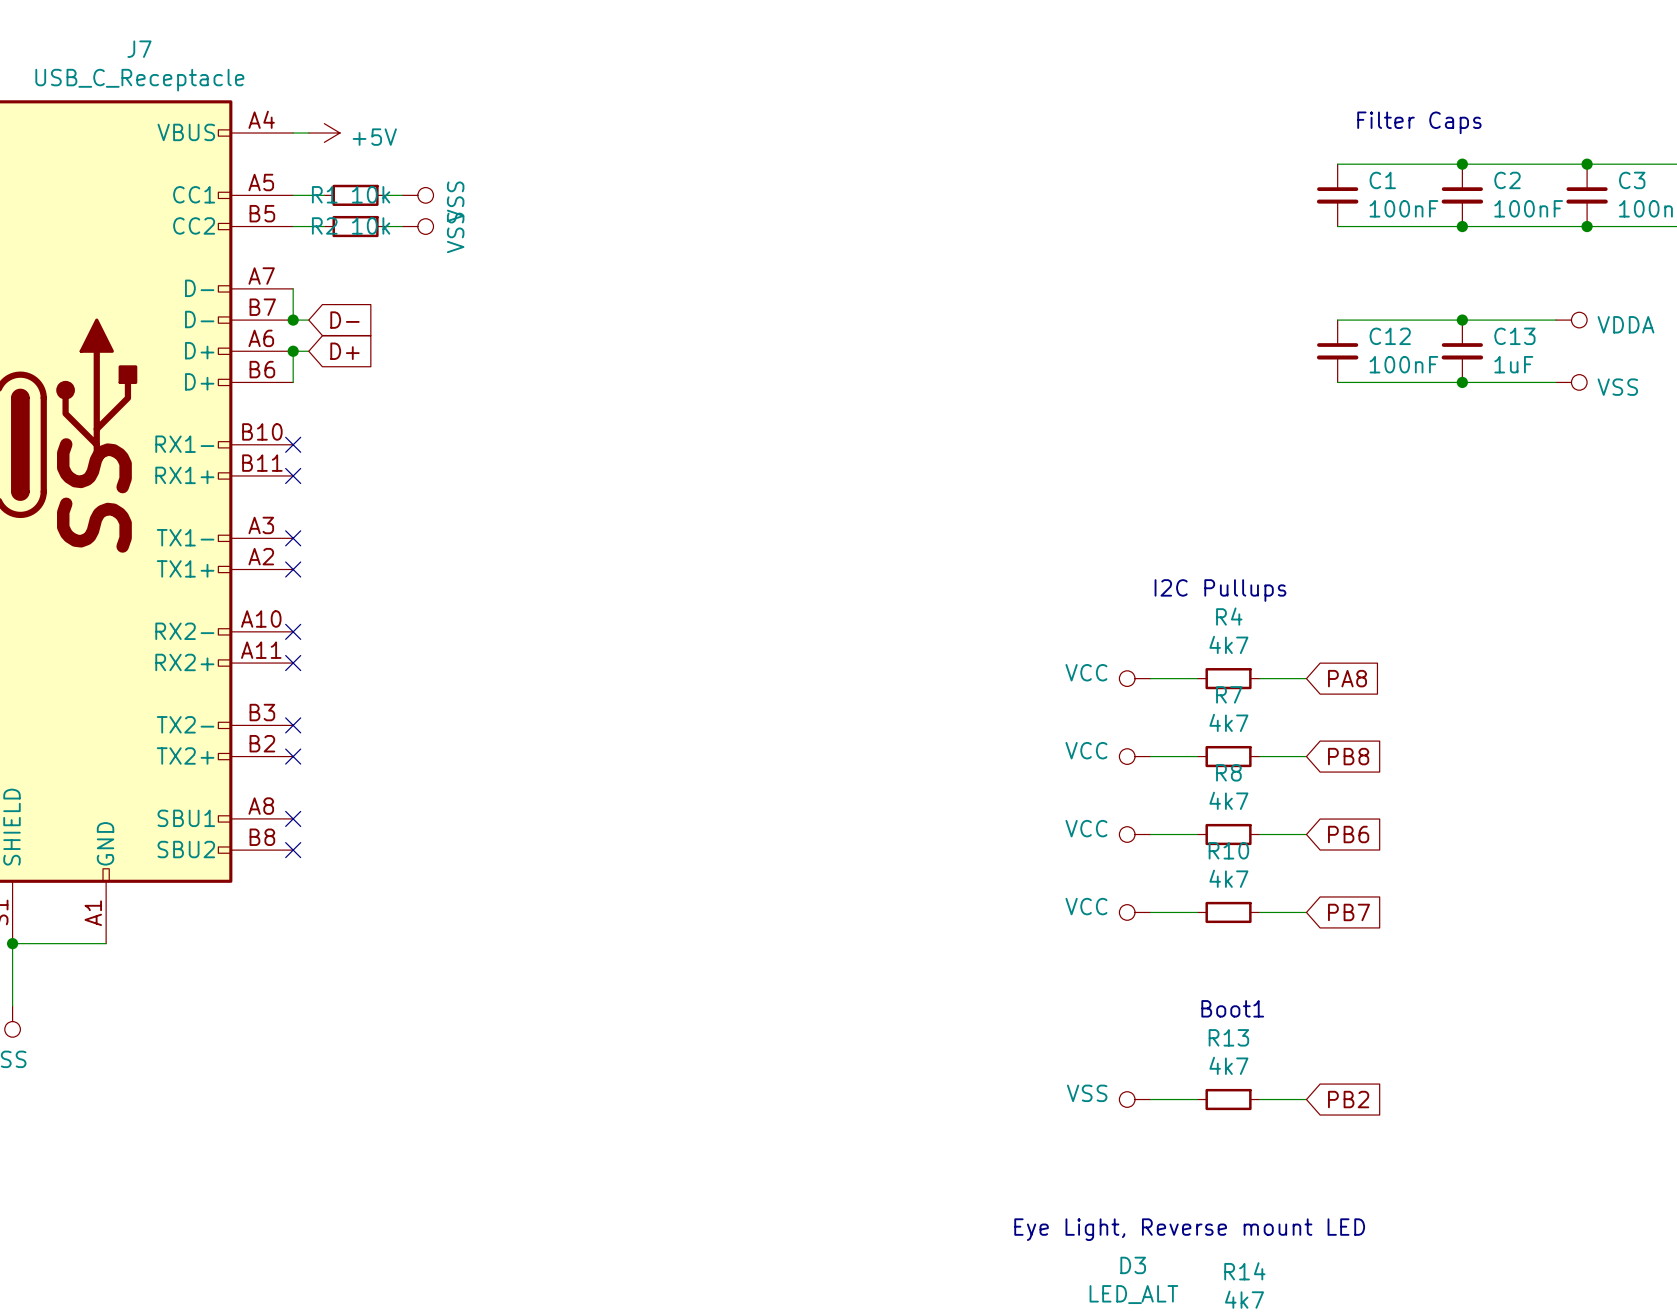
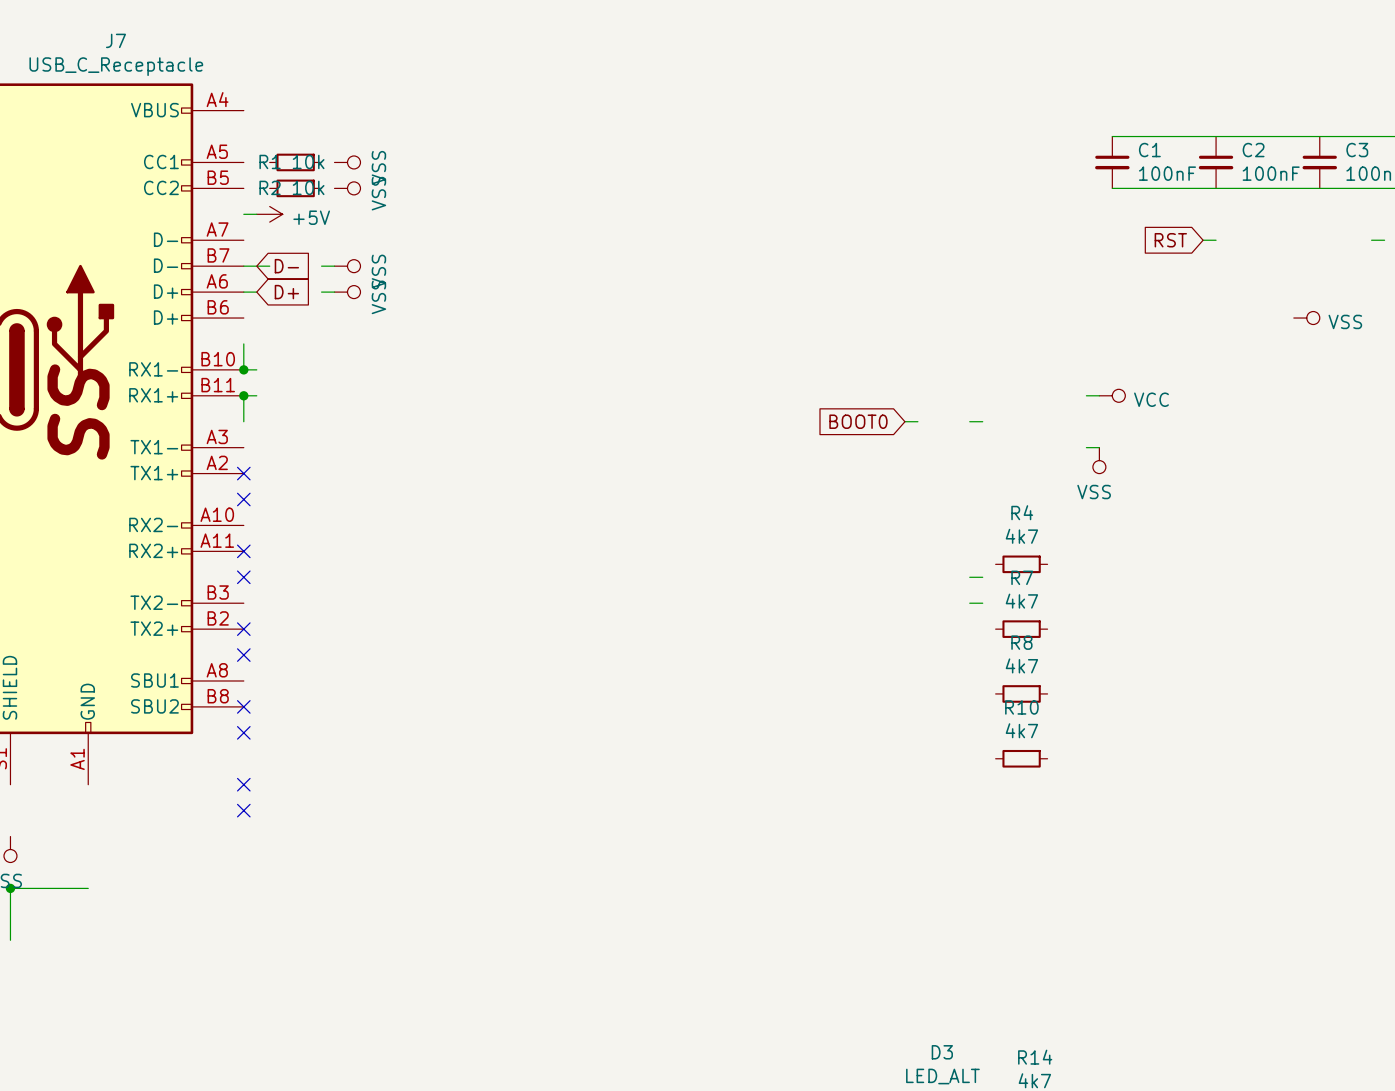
text: Filter Caps (1419, 122) -> none
wire: (293, 133) (308, 133) -> (243, 214) (256, 214)
power symbol position: +5V (324, 133) -> +5V (269, 214)
junction: (1462, 164) -> none
junction: (1587, 164) -> none
wire: (293, 195) (324, 195) -> none
wire: (386, 195) (402, 195) -> (321, 266) (334, 266)
wire: (293, 226) (324, 226) -> none
wire: (386, 226) (402, 226) -> (321, 292) (334, 292)
junction: (1462, 226) -> none
junction: (1587, 226) -> none
wire: (293, 288) (293, 320) -> none
global label: none -> RST (1170, 240)
wire: none -> (1203, 240) (1216, 240)
wire: none -> (1371, 240) (1384, 240)
junction: (293, 320) -> none
wire: none -> (256, 266) (269, 266)
power symbol: none -> VSS (347, 266)
wire: (1337, 320) (1555, 320) -> none
junction: (1462, 320) -> none
power symbol: VDDA (1571, 320) -> none
wire: (293, 351) (293, 382) -> none
junction: (293, 351) -> none
power symbol: none -> VSS (347, 292)
C12: 100nF (1337, 351) -> none
C13: 1uF (1462, 351) -> none
wire: (1337, 382) (1555, 382) -> none
junction: (1462, 382) -> none
wire: none -> (243, 343) (243, 369) (256, 369)
junction: none -> (243, 369)
no-connect mark: (293, 444) -> none
junction: none -> (243, 395)
no-connect mark: (293, 475) -> none
wire: none -> (256, 395) (243, 395) (243, 421)
wire: none -> (1086, 395) (1099, 395)
power symbol: none -> VCC (1112, 395)
global label: none -> BOOT0 (858, 421)
wire: none -> (904, 421) (917, 421)
wire: none -> (969, 421) (982, 421)
no-connect mark: (293, 538) -> none
wire: none -> (1086, 447) (1099, 447)
power symbol: none -> VSS (1099, 460)
text: I2C Pullups (1220, 590) -> none
no-connect mark: none -> (243, 499)
no-connect mark: (293, 631) -> none
power symbol: VCC (1134, 678) -> none
wire: (1150, 678) (1197, 678) -> none
wire: (1259, 678) (1306, 678) -> none
global label: PA8 (1347, 678) -> none
no-connect mark: none -> (243, 577)
wire: none -> (969, 577) (982, 577)
no-connect mark: (293, 725) -> none
wire: none -> (969, 603) (982, 603)
power symbol: VCC (1134, 756) -> none
wire: (1150, 756) (1197, 756) -> none
wire: (1259, 756) (1306, 756) -> none
global label: PB8 (1348, 756) -> none
no-connect mark: none -> (243, 655)
no-connect mark: (293, 818) -> none
power symbol: VCC (1134, 834) -> none
wire: (1150, 834) (1197, 834) -> none
wire: (1259, 834) (1306, 834) -> none
global label: PB6 (1348, 834) -> none
no-connect mark: none -> (243, 732)
power symbol: VCC (1134, 912) -> none
wire: (1150, 912) (1197, 912) -> none
wire: (1259, 912) (1306, 912) -> none
global label: PB7 (1349, 912) -> none
junction: (12, 943) -> none
wire: (106, 943) (12, 943) (12, 1005) -> (88, 888) (10, 888) (10, 940)
no-connect mark: none -> (243, 784)
no-connect mark: none -> (243, 810)
text: Boot1 (1232, 1008) -> none
junction: none -> (10, 888)
power symbol: VSS (1134, 1099) -> none
wire: (1150, 1099) (1197, 1099) -> none
R13: 4k7 (1228, 1099) -> none
wire: (1259, 1099) (1306, 1099) -> none
global label: PB2 (1348, 1099) -> none
text: Eye Light, Reverse mount LED (1189, 1229) -> none

